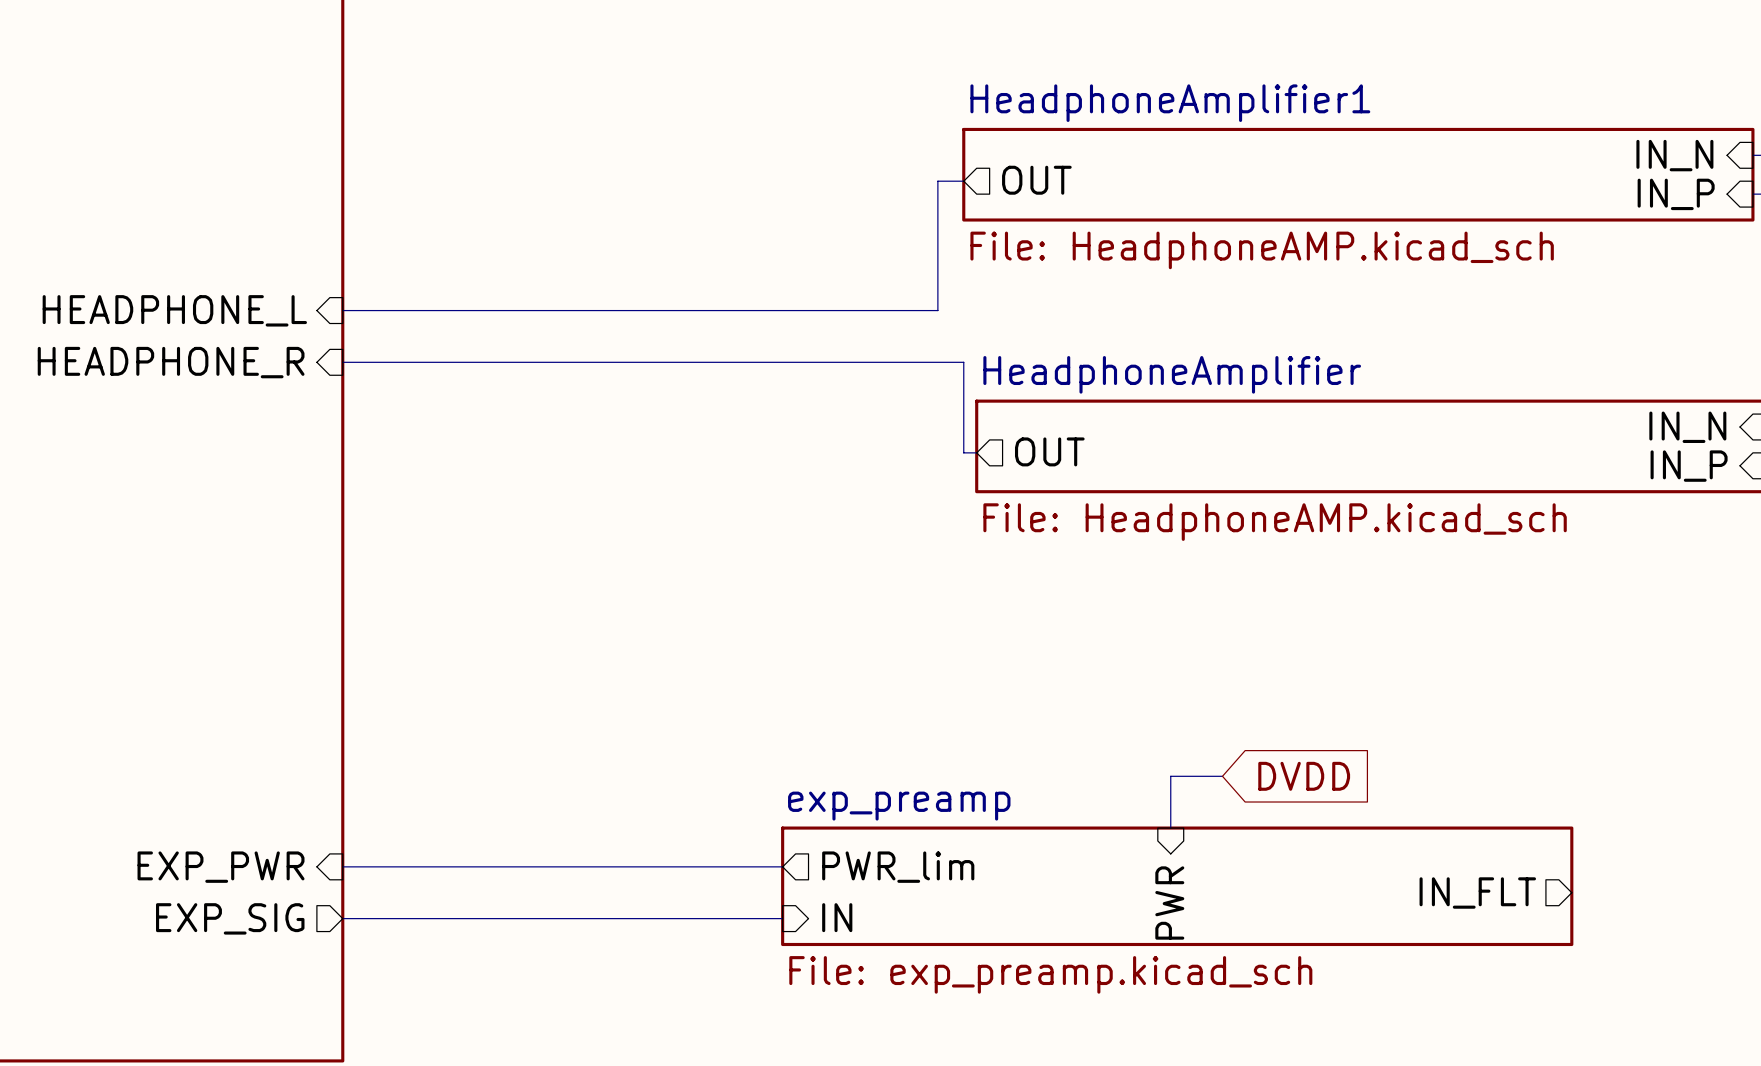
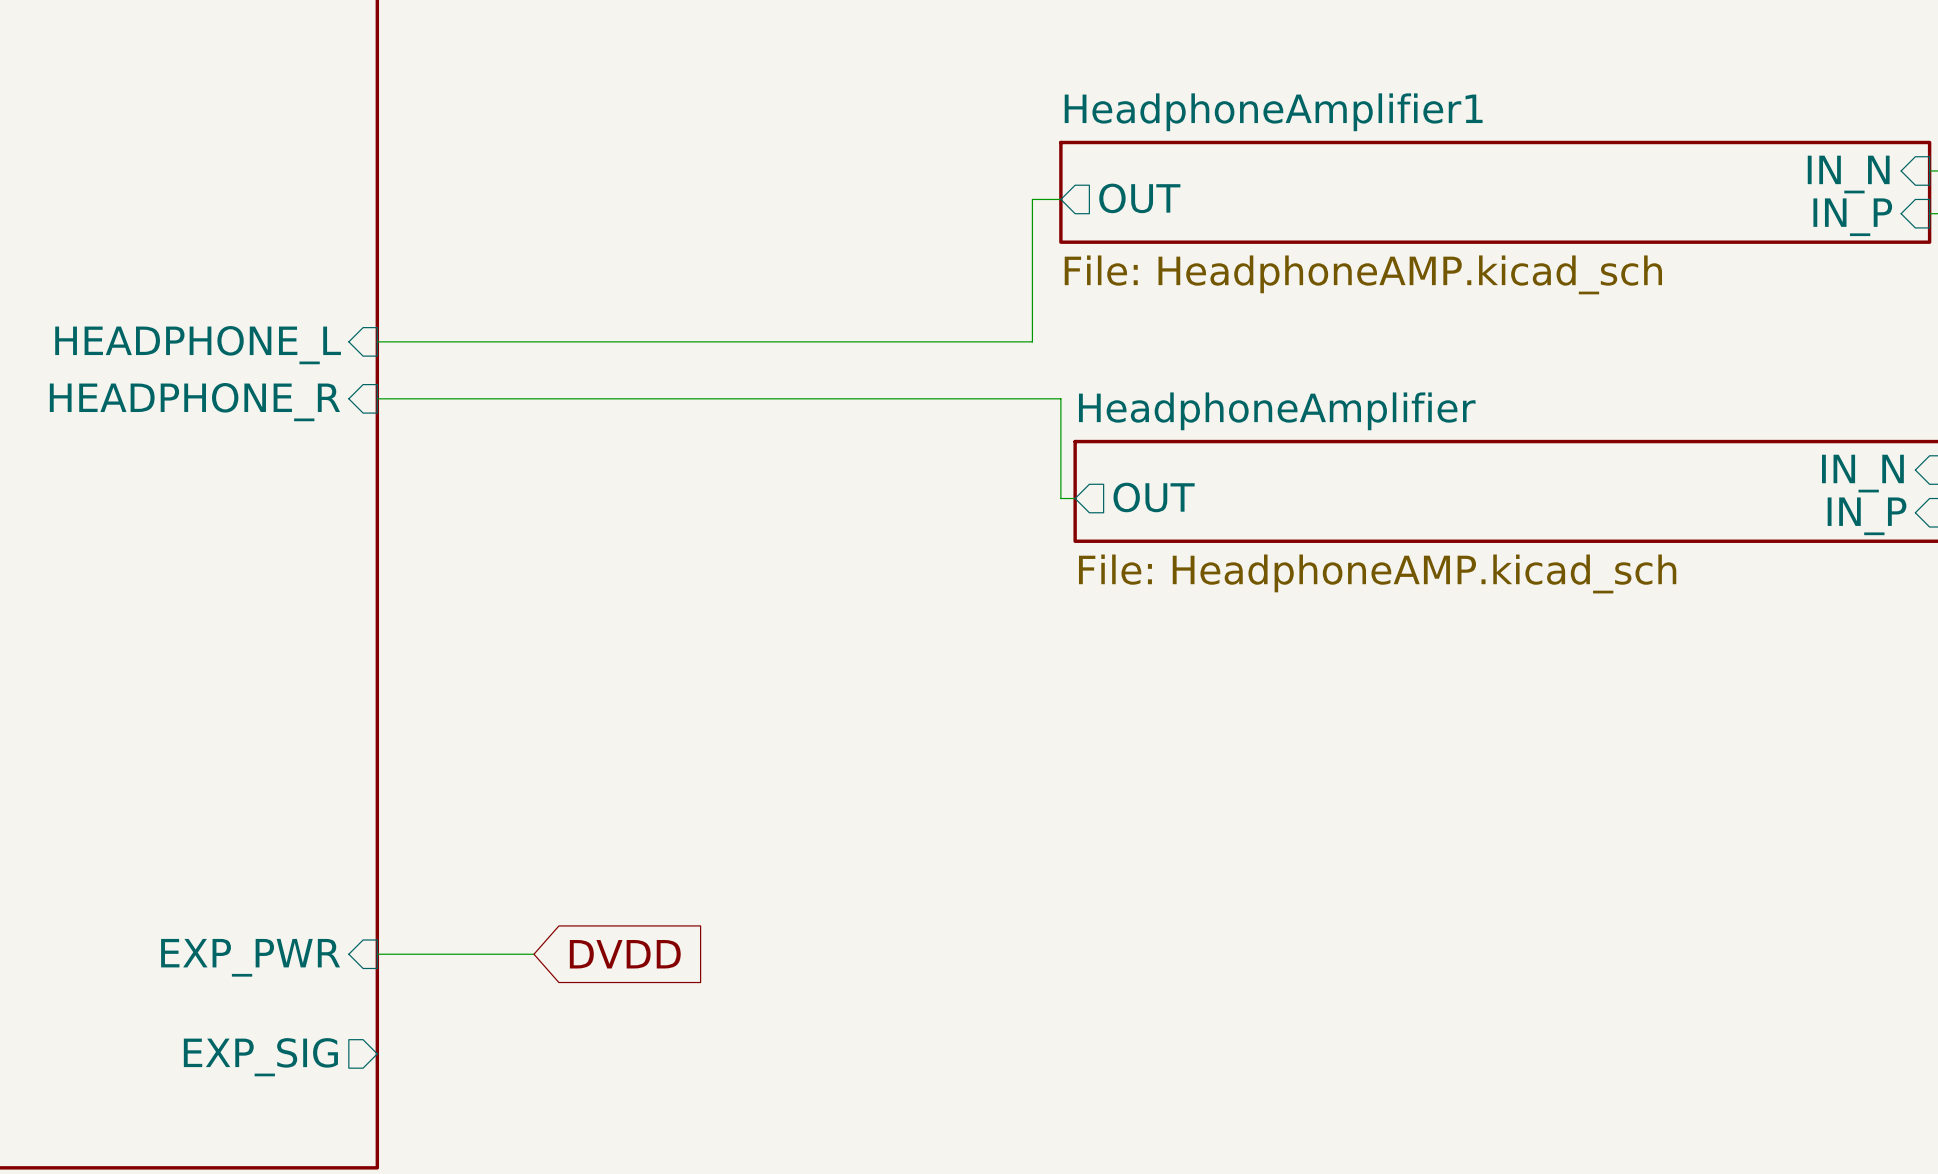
wire: (1222, 776) (1170, 776) (1170, 828) -> none
global label: DVDD (1304, 776) -> none
wire: (485, 866) (782, 866) -> none
global label: none -> DVDD (625, 954)
sheet pin: PWR_lim (898, 867) -> none
sheet exp_preamp: File: exp_preamp.kicad_sch (1177, 886) -> none
sheet pin: IN_FLT (1477, 893) -> none
sheet pin: PWR (1169, 903) -> none
sheet pin: IN (837, 917) -> none
sheet pin position: EXP_SIG (230, 918) -> EXP_SIG (260, 1057)
wire: (342, 918) (782, 918) -> none

